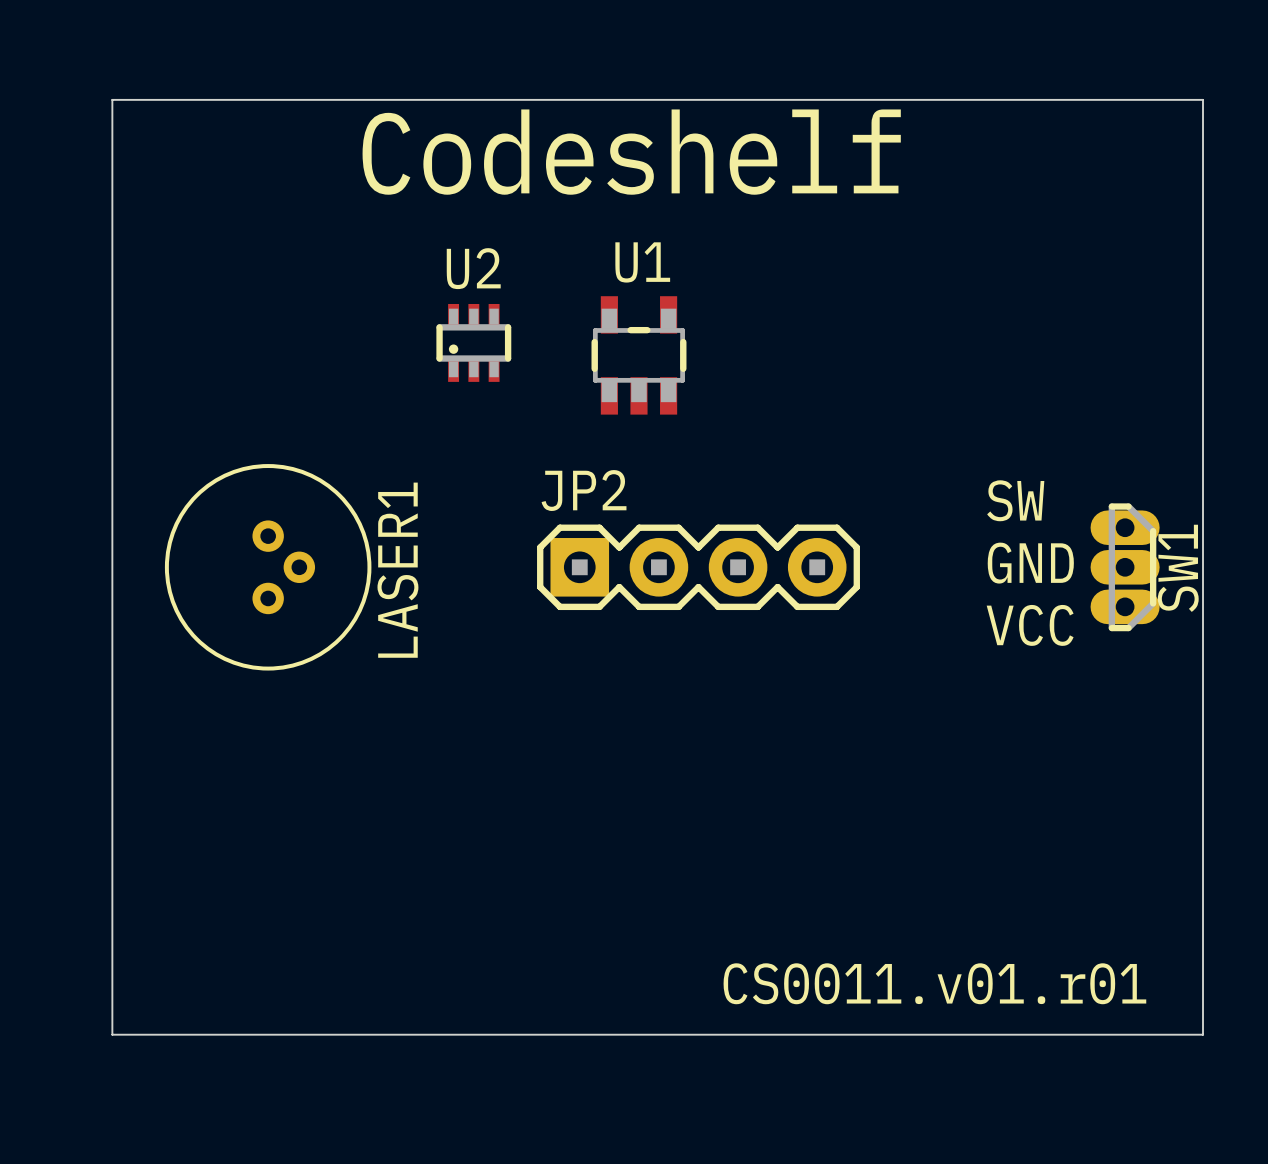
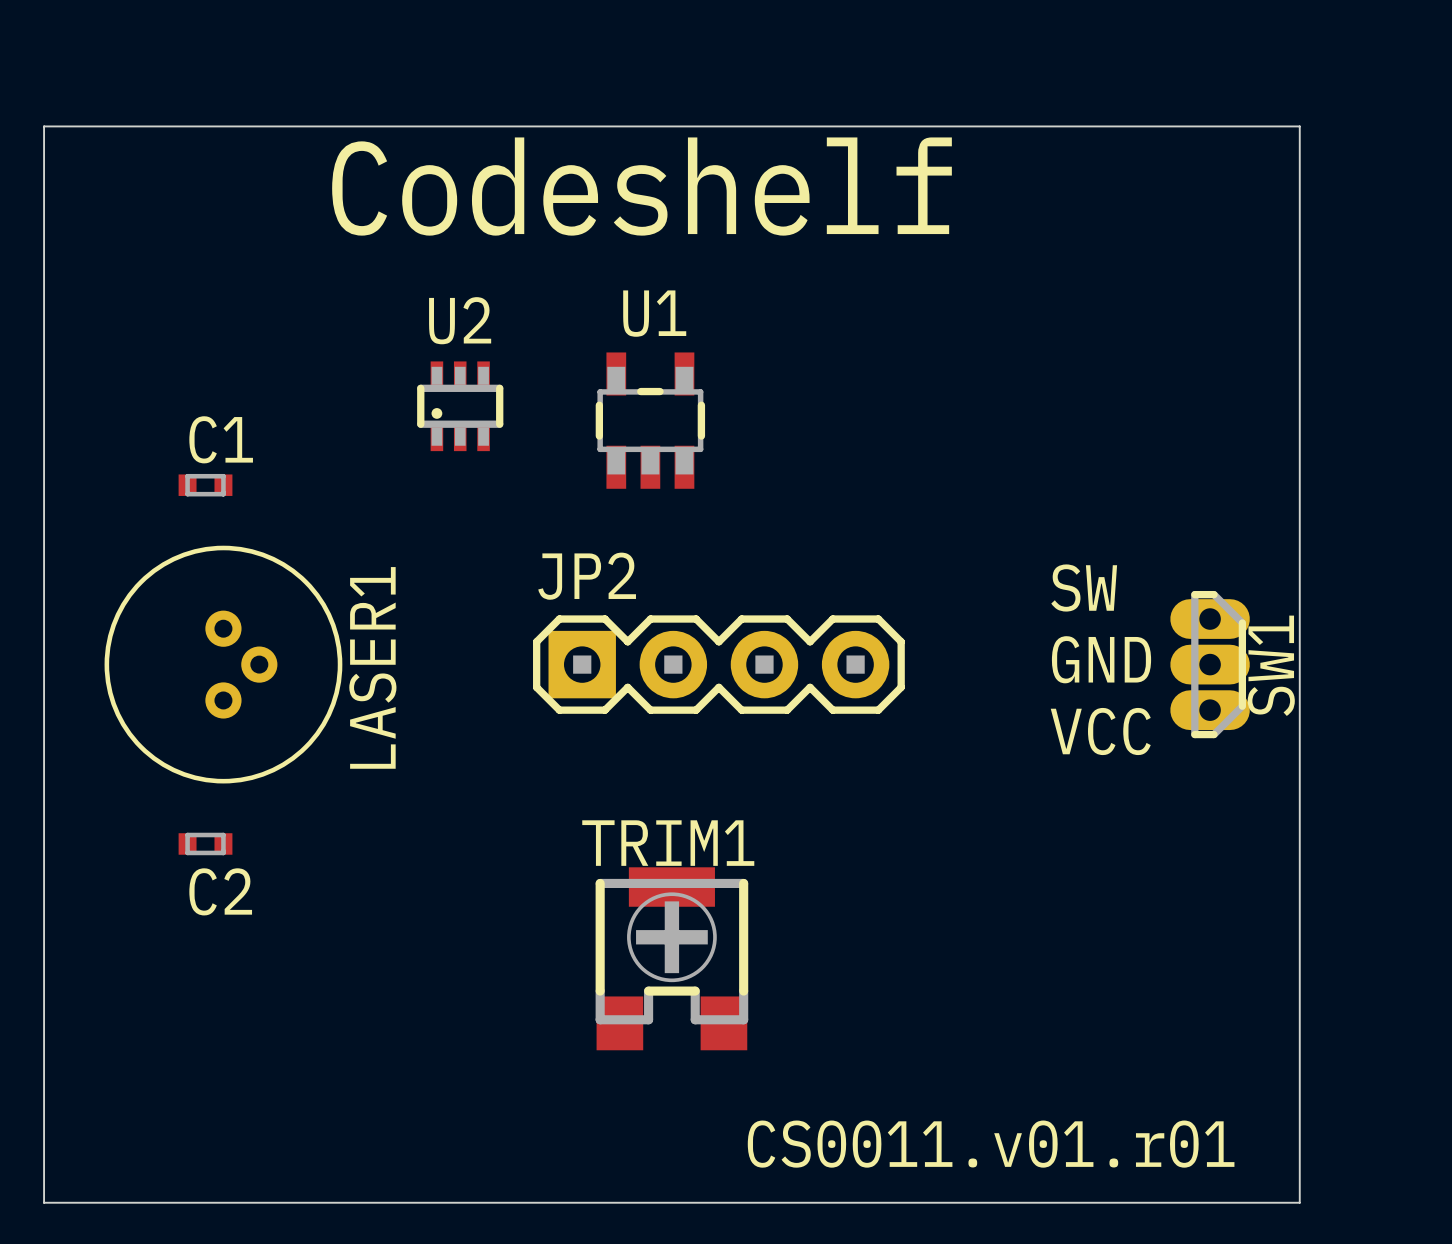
C1: none -> (205, 485)
C2: none -> (205, 843)
TRIM1: none -> (671, 958)

